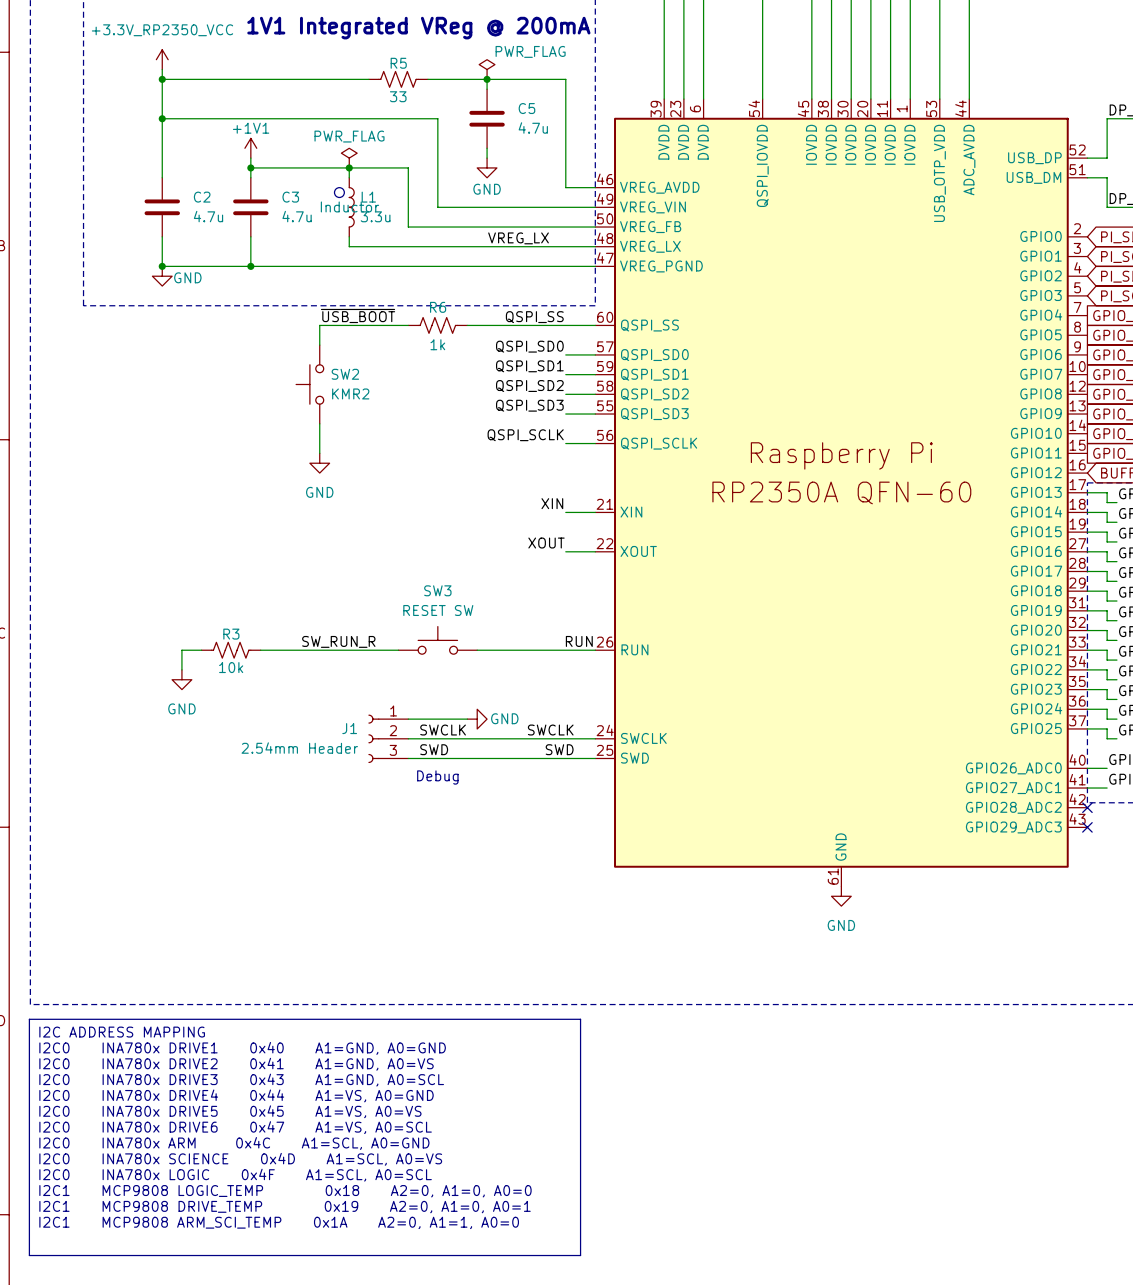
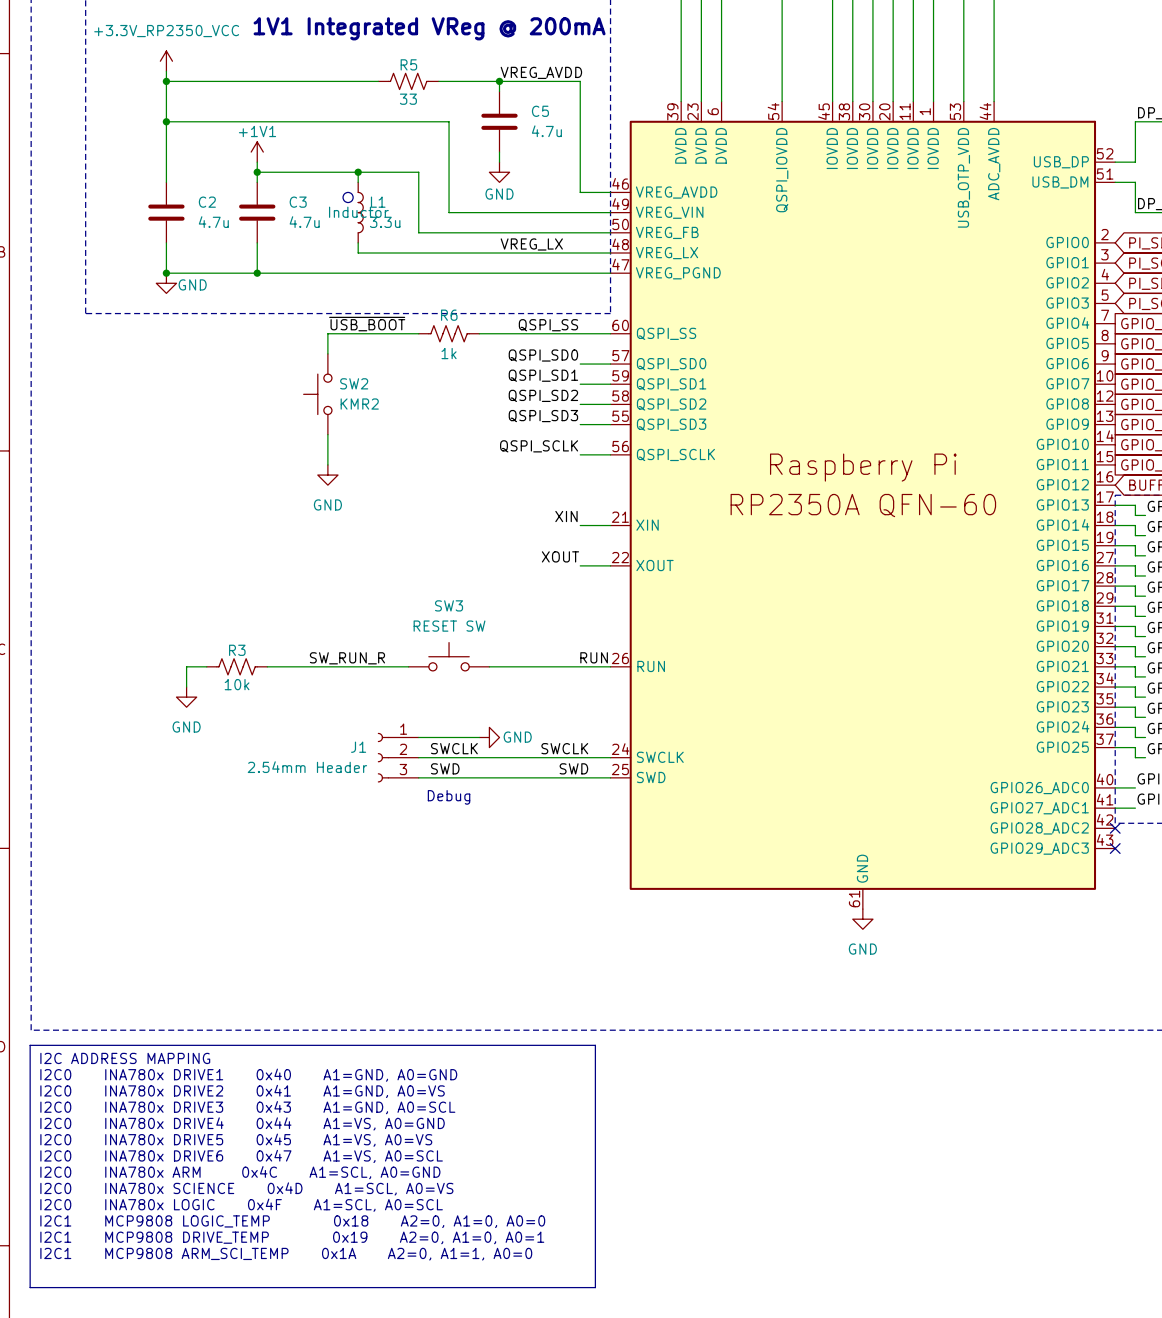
power symbol: PWR_FLAG (487, 69) -> none
label: none -> VREG_AVDD (541, 72)
power symbol: PWR_FLAG (349, 158) -> none

